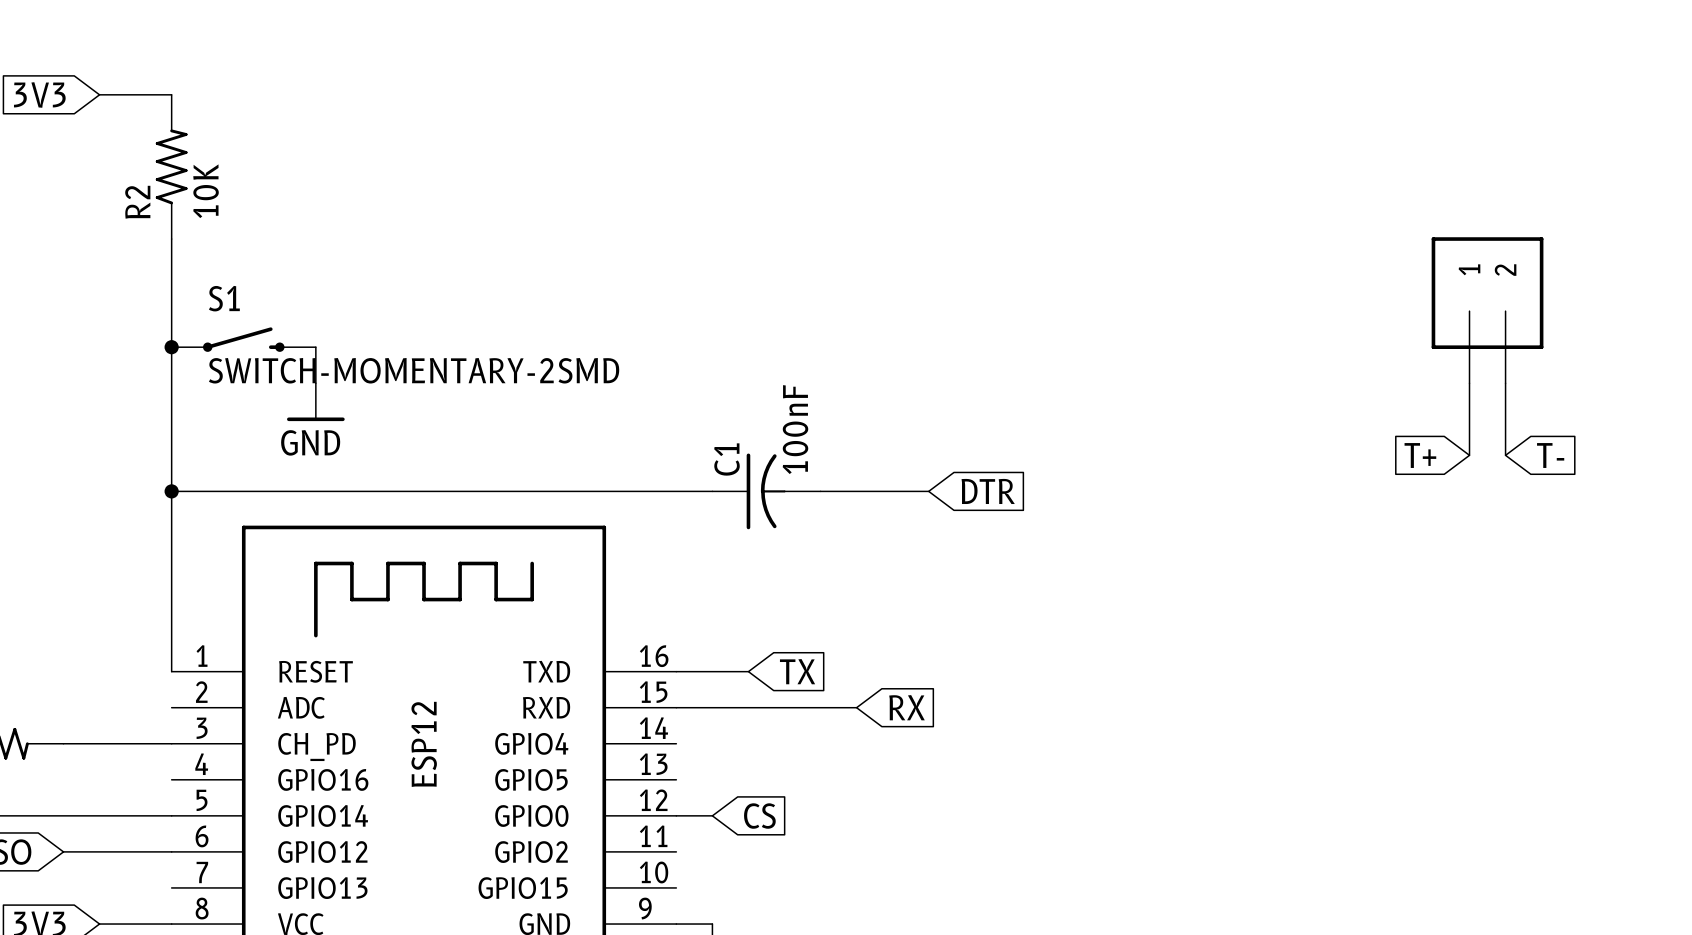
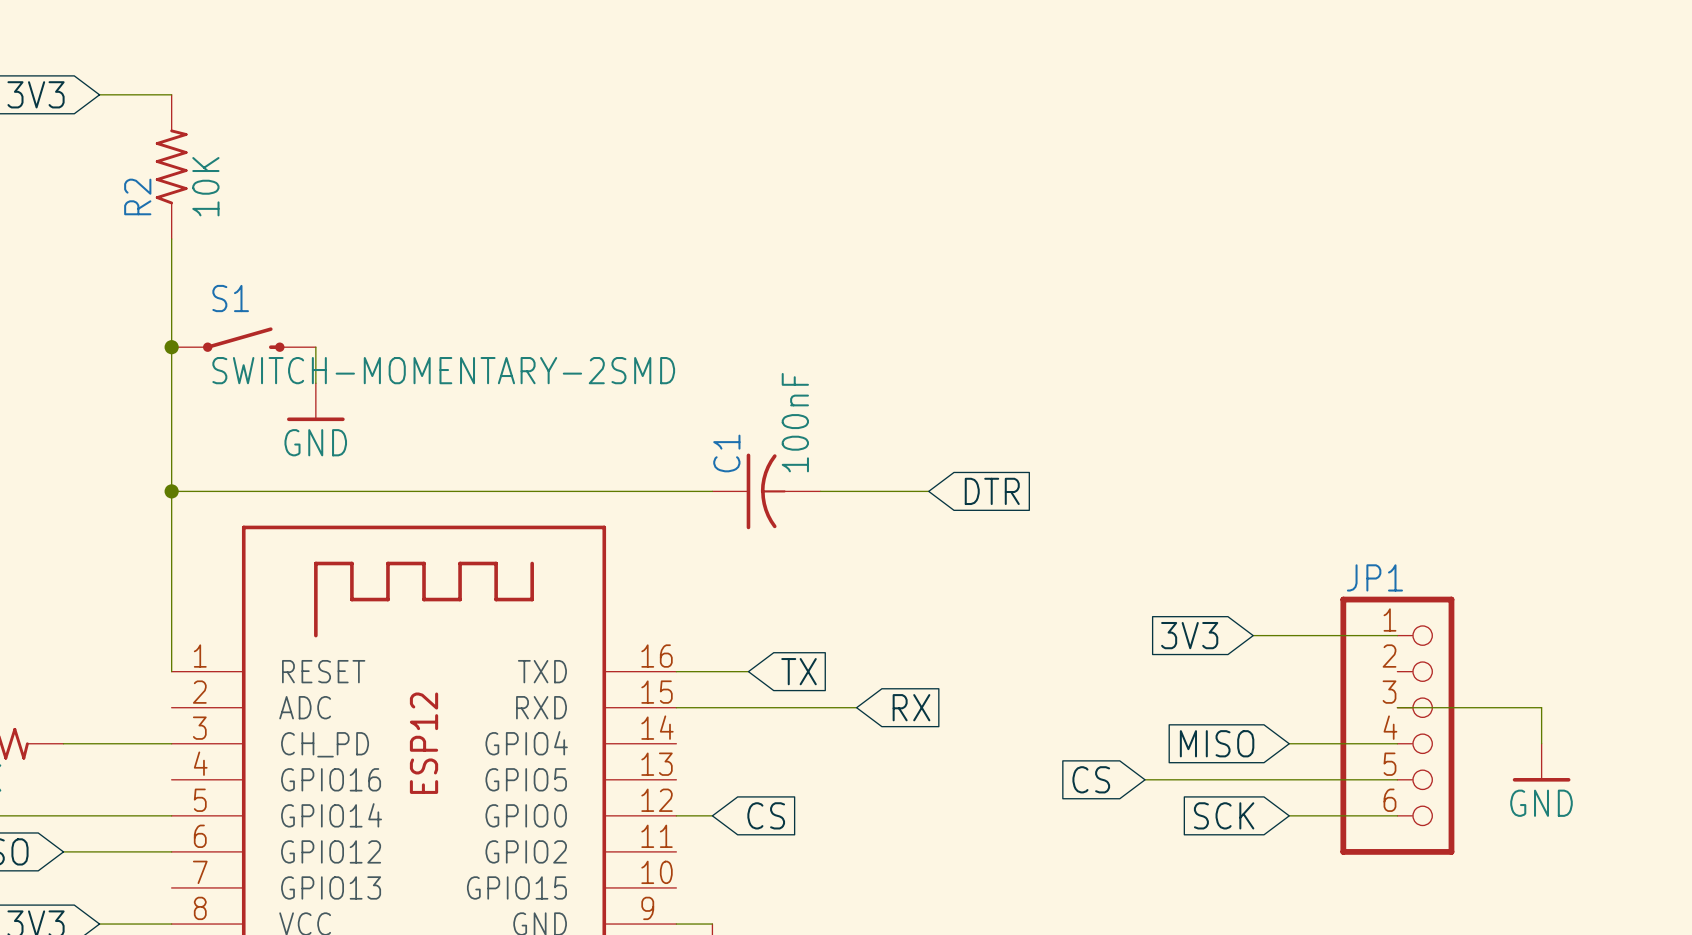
part: (1487, 310) -> none
wire: (1469, 383) (1469, 455) -> none
wire: (1505, 383) (1505, 455) -> none
global label: T+ (1420, 455) -> none
global label: T- (1550, 455) -> none
global label: none -> 3V3 (1189, 635)
wire: none -> (1253, 635) (1397, 635)
wire: none -> (1397, 707) (1541, 707) (1541, 743)
JP1: none -> (1397, 725)
global label: none -> MISO (1217, 743)
wire: none -> (1289, 743) (1397, 743)
power symbol: none -> GND (1541, 762)
global label: none -> CS (1091, 779)
wire: none -> (1145, 779) (1397, 779)
wire: none -> (1289, 815) (1397, 815)
global label: none -> SCK (1224, 815)

